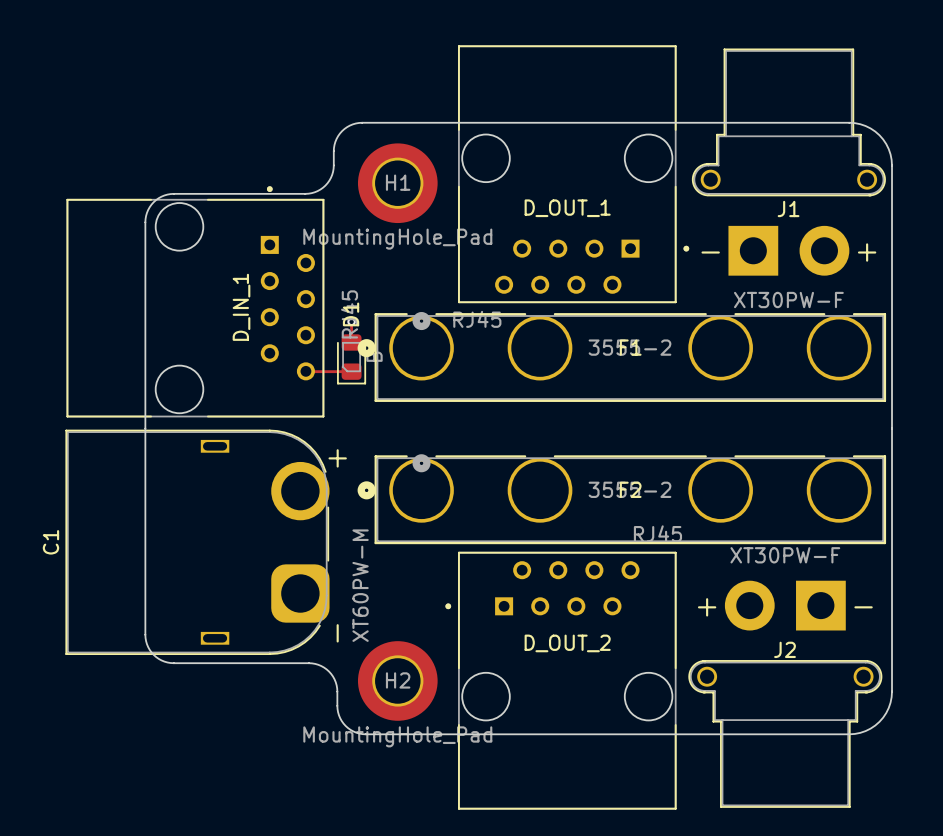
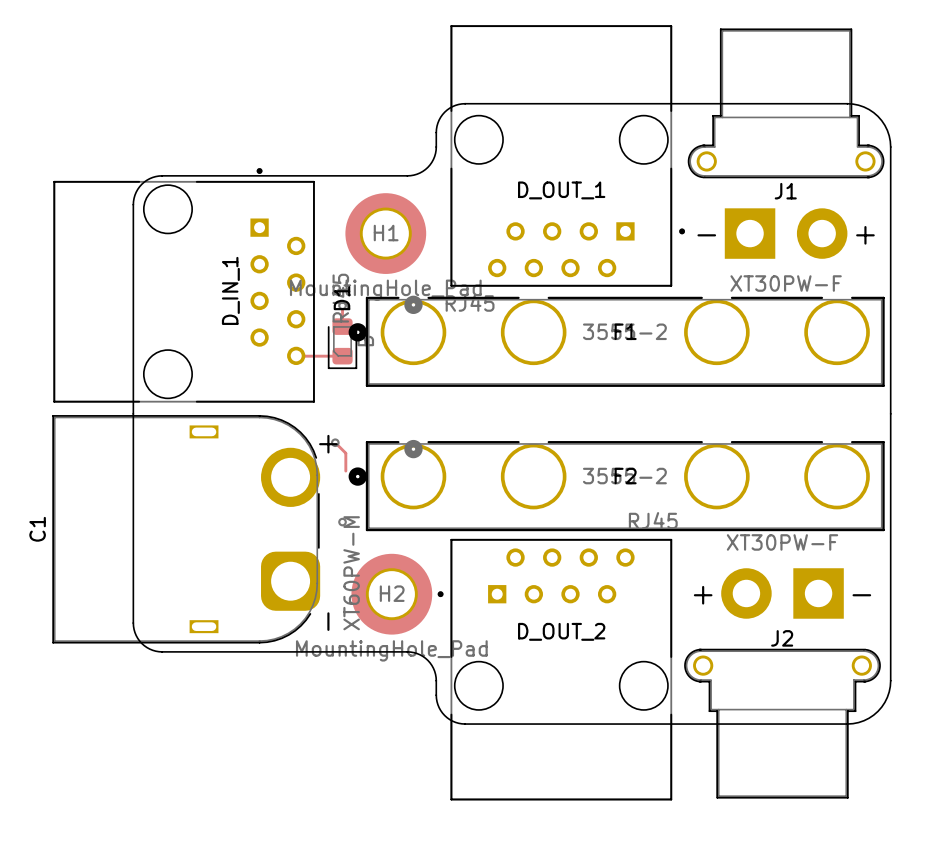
board edge: (472, 122) (362, 122) (349, 125) (340, 133) (335, 141) (333, 168) (329, 180) (317, 191) (305, 193) -> (465, 103) (449, 108) (440, 117) (436, 129) (434, 156) (429, 165) (419, 173) (407, 175) (295, 175)
H1 position: (397, 183) -> (385, 233)
track: none -> (335, 442) (345, 453) (345, 471)
via: none -> (335, 442)
via: none -> (342, 522)
board edge: (308, 663) (324, 667) (333, 676) (337, 688) (338, 715) (343, 723) (353, 731) (365, 734) (472, 734) -> (299, 651) (407, 651) (419, 654) (429, 662) (434, 671) (436, 698) (440, 710) (452, 721) (465, 724)
H2 position: (397, 680) -> (391, 594)

